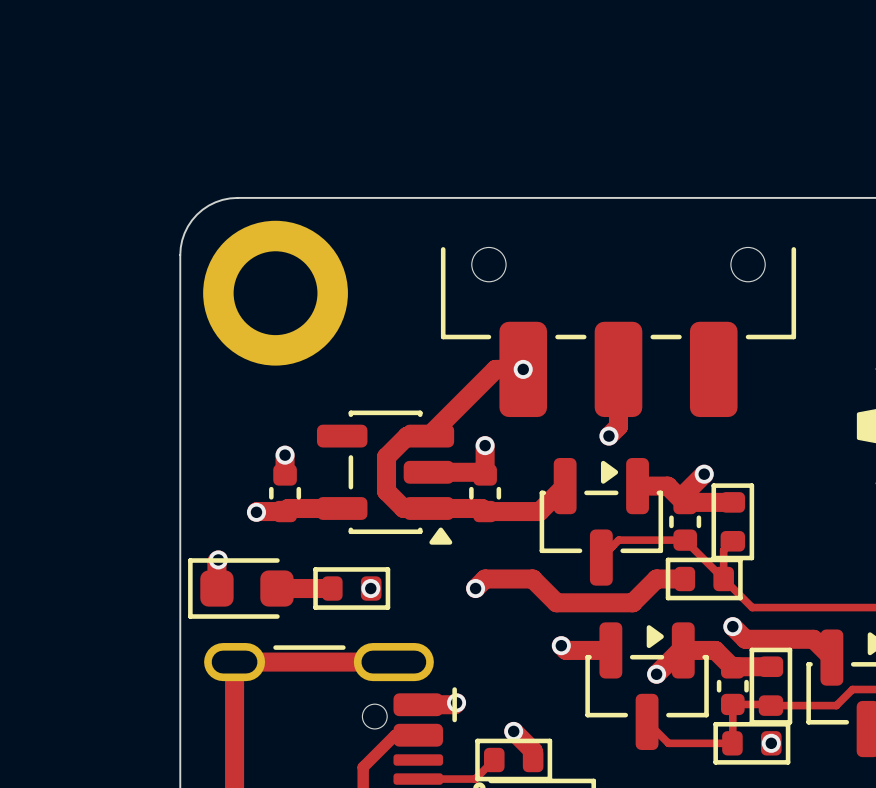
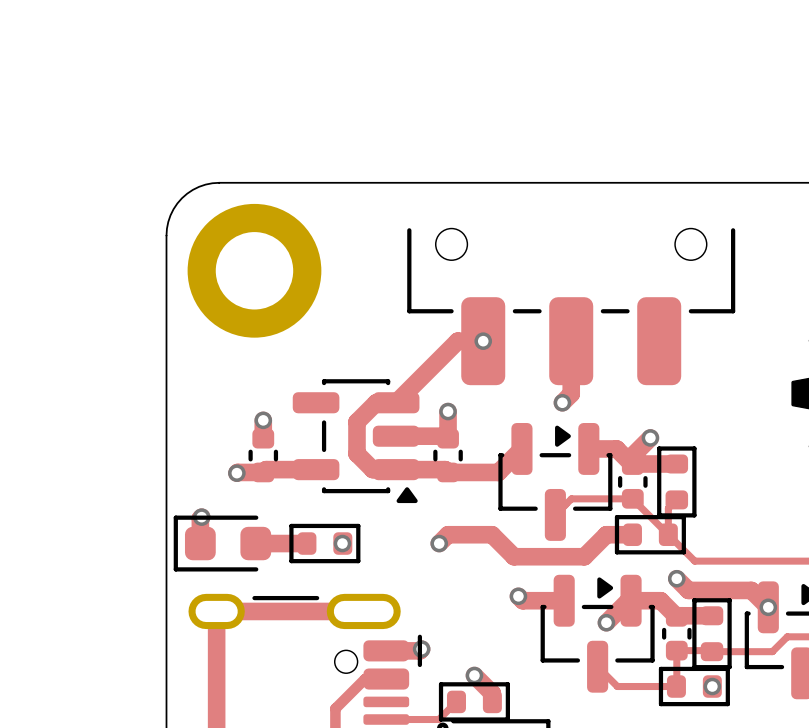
via: none -> (768, 607)

